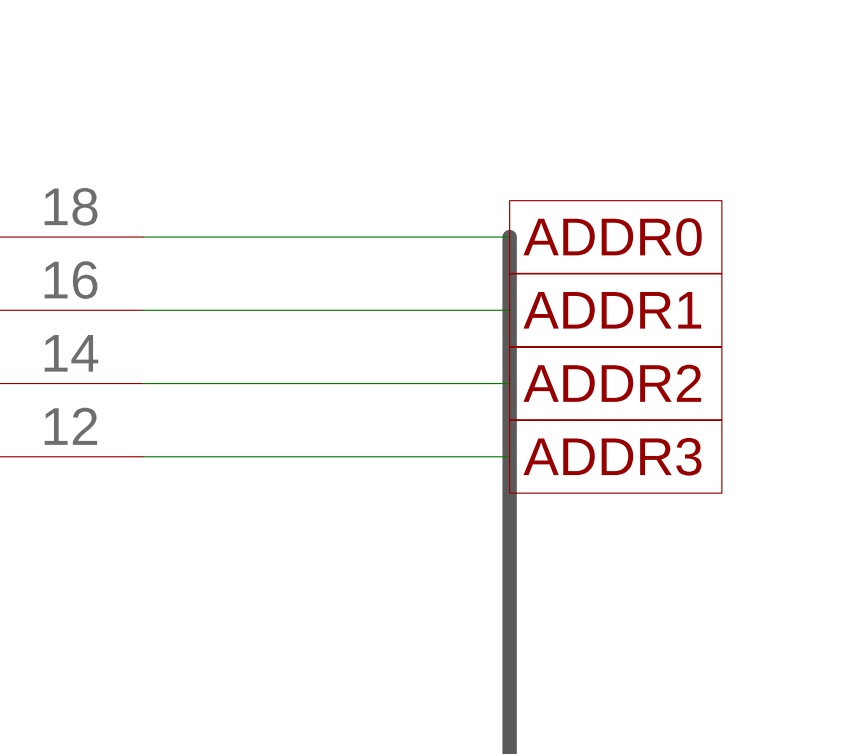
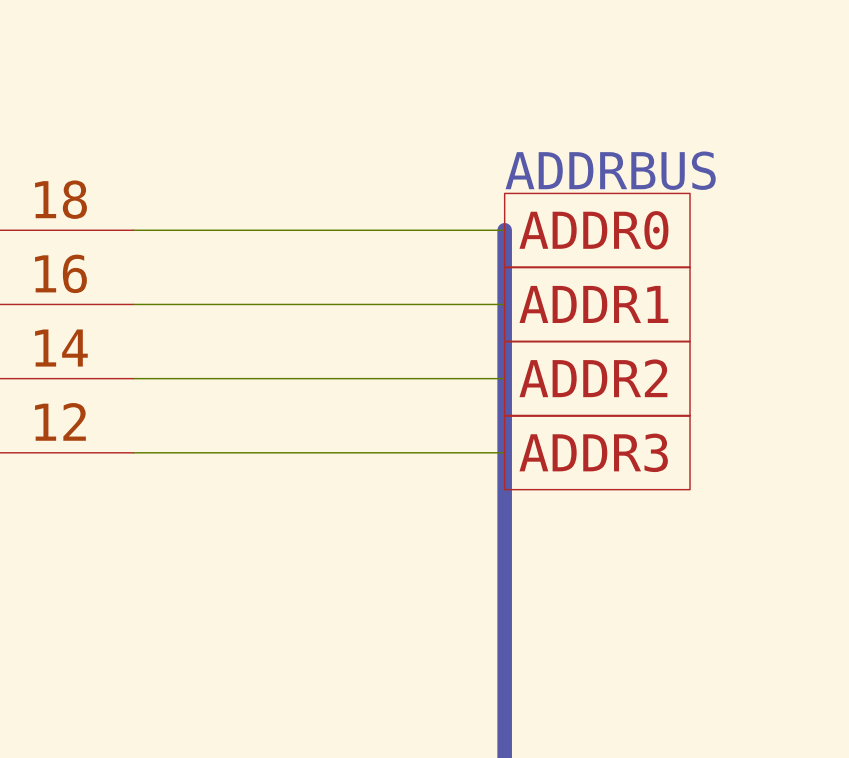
text: none -> ADDRBUS (610, 170)

